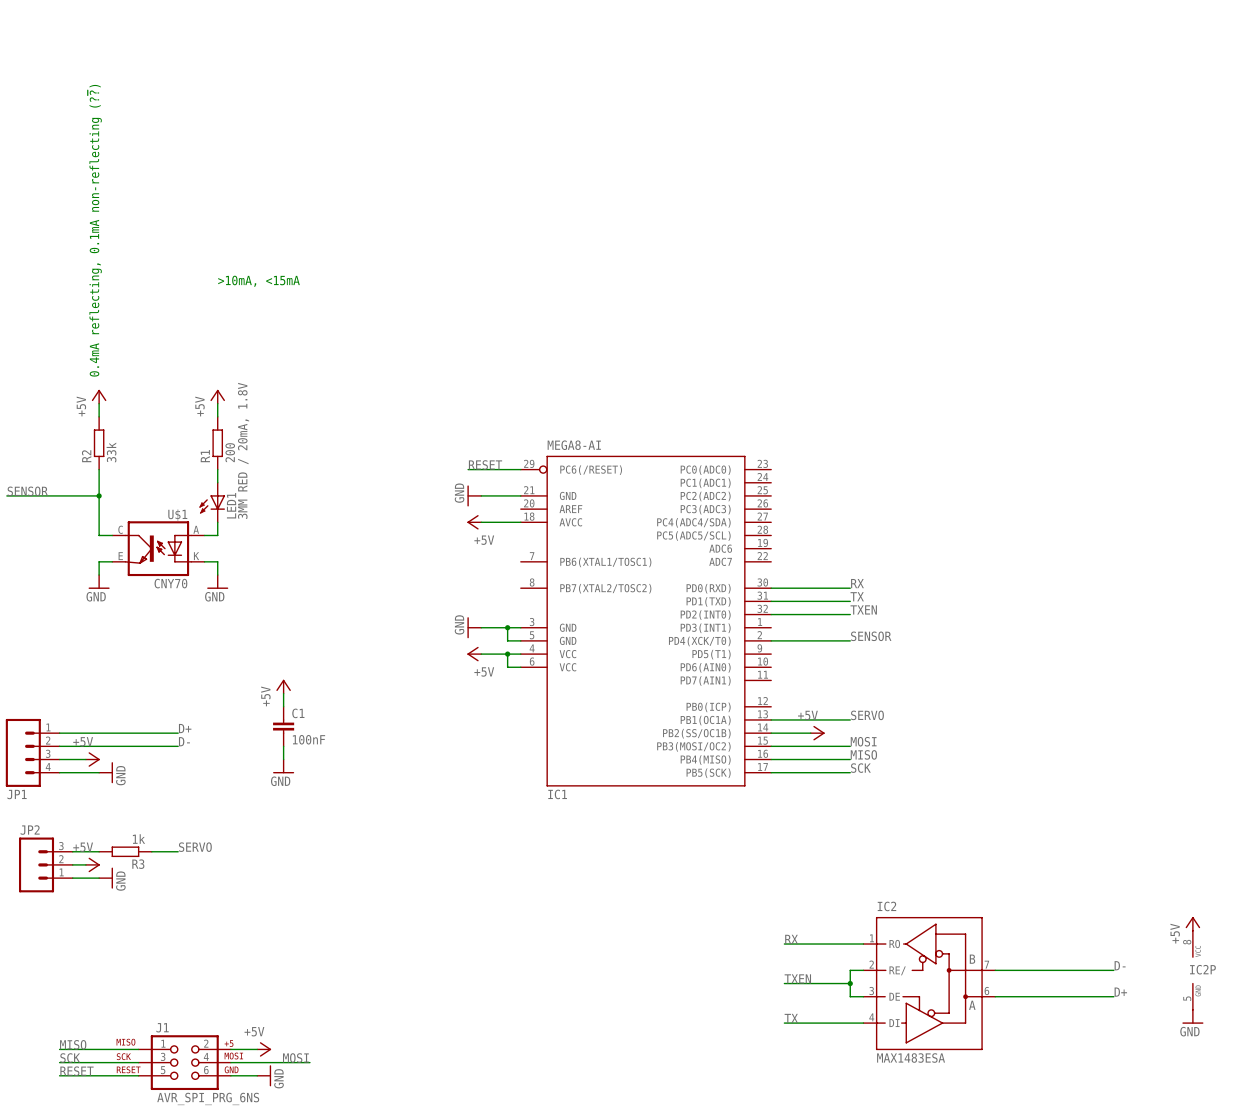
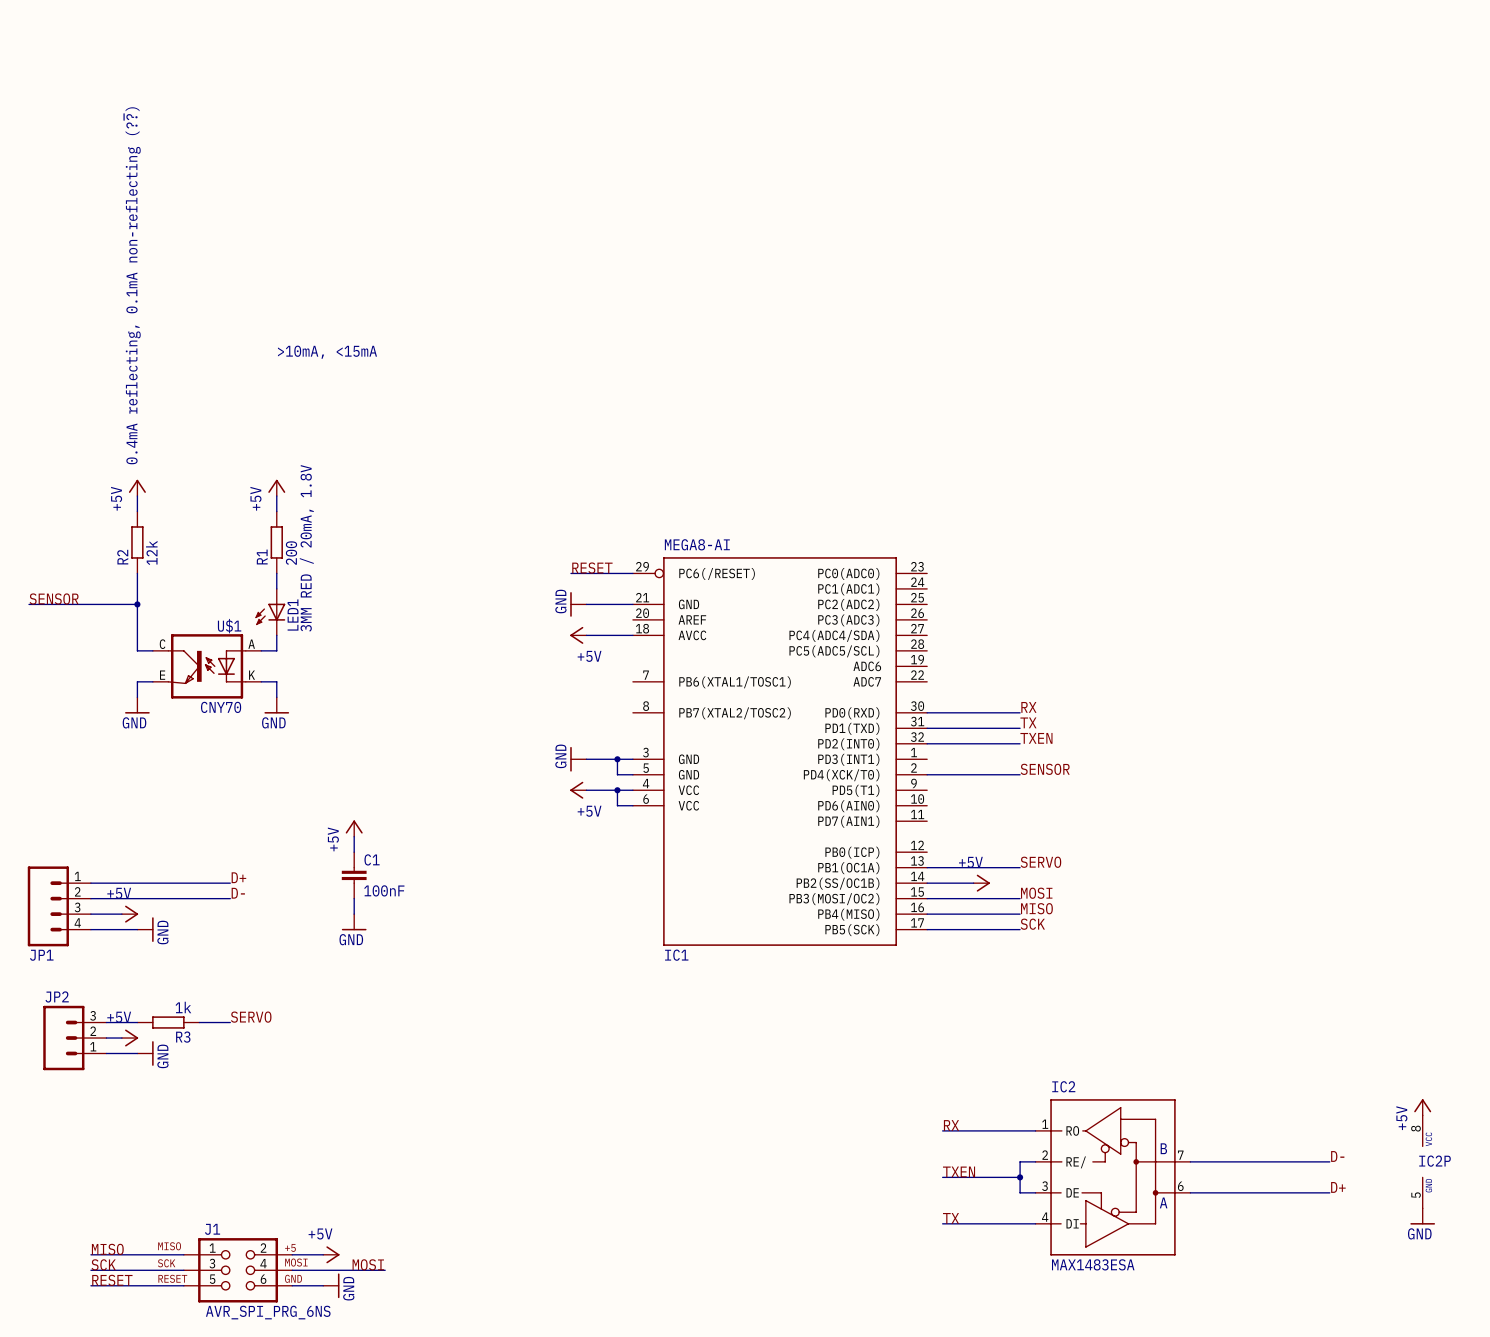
R2 value: 33k (111, 452) -> 12k (151, 552)

